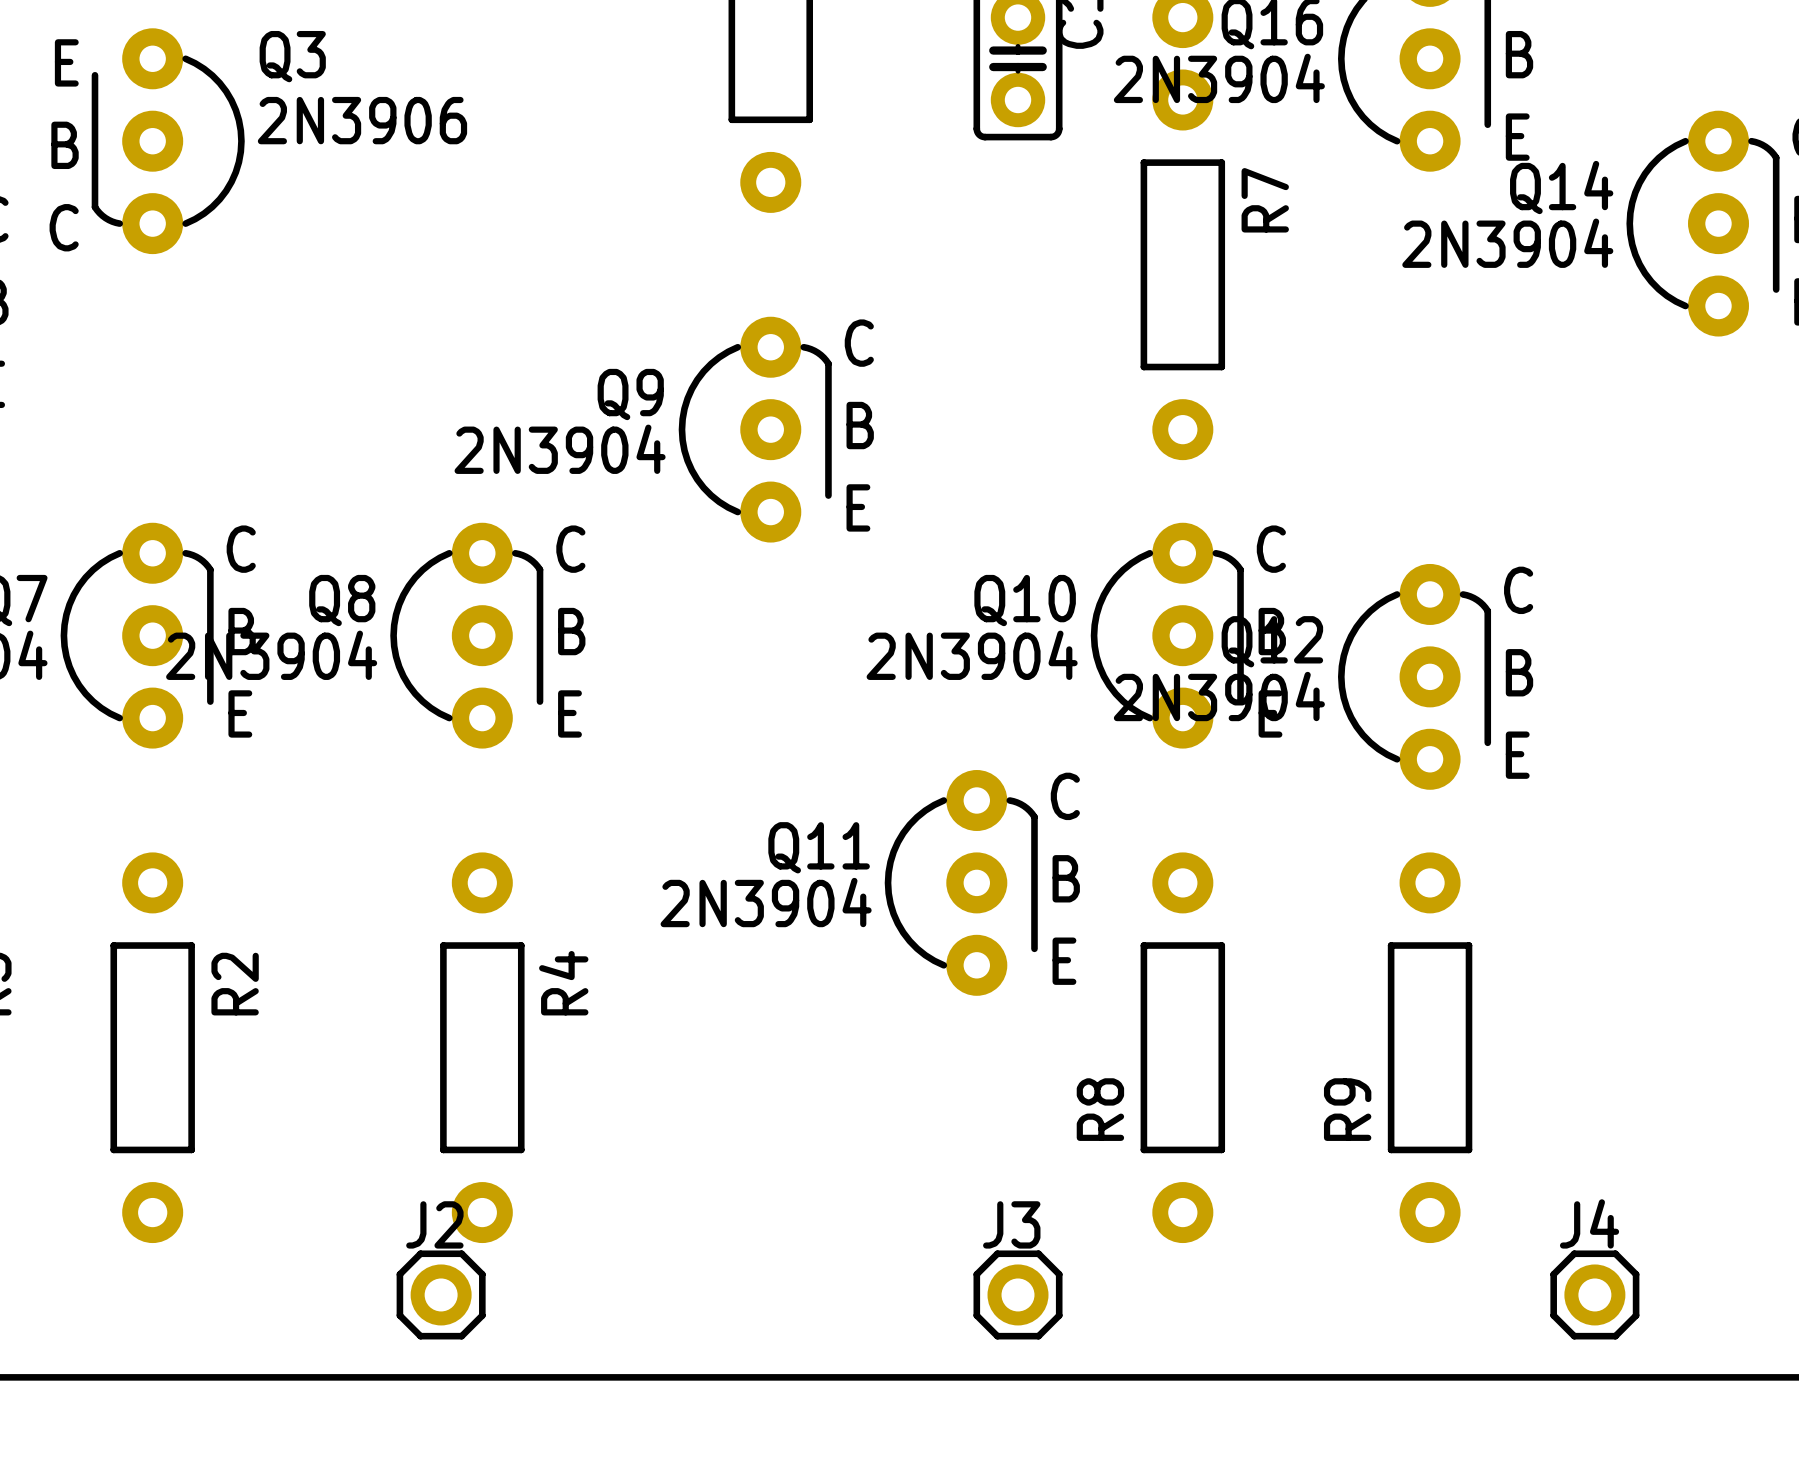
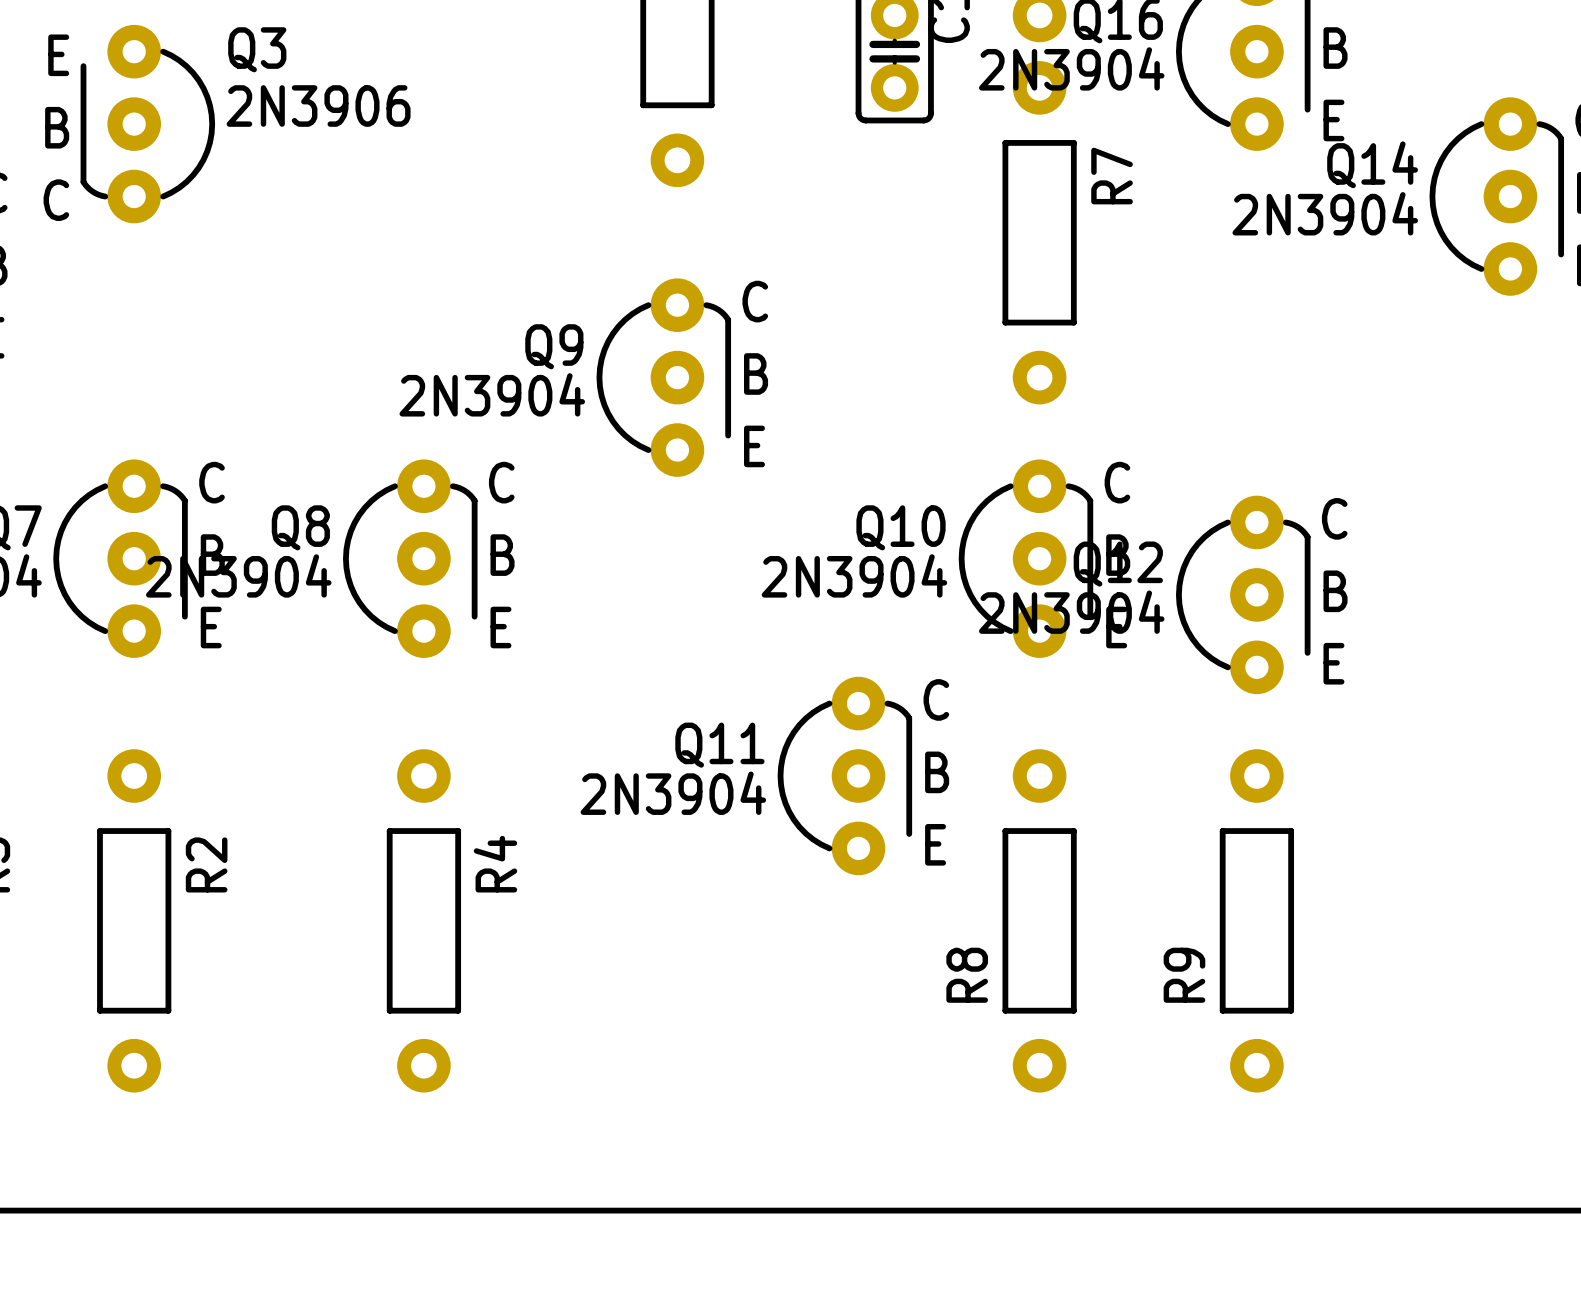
J2: (441, 1294) -> none
J3: (1018, 1294) -> none
J4: (1594, 1294) -> none

